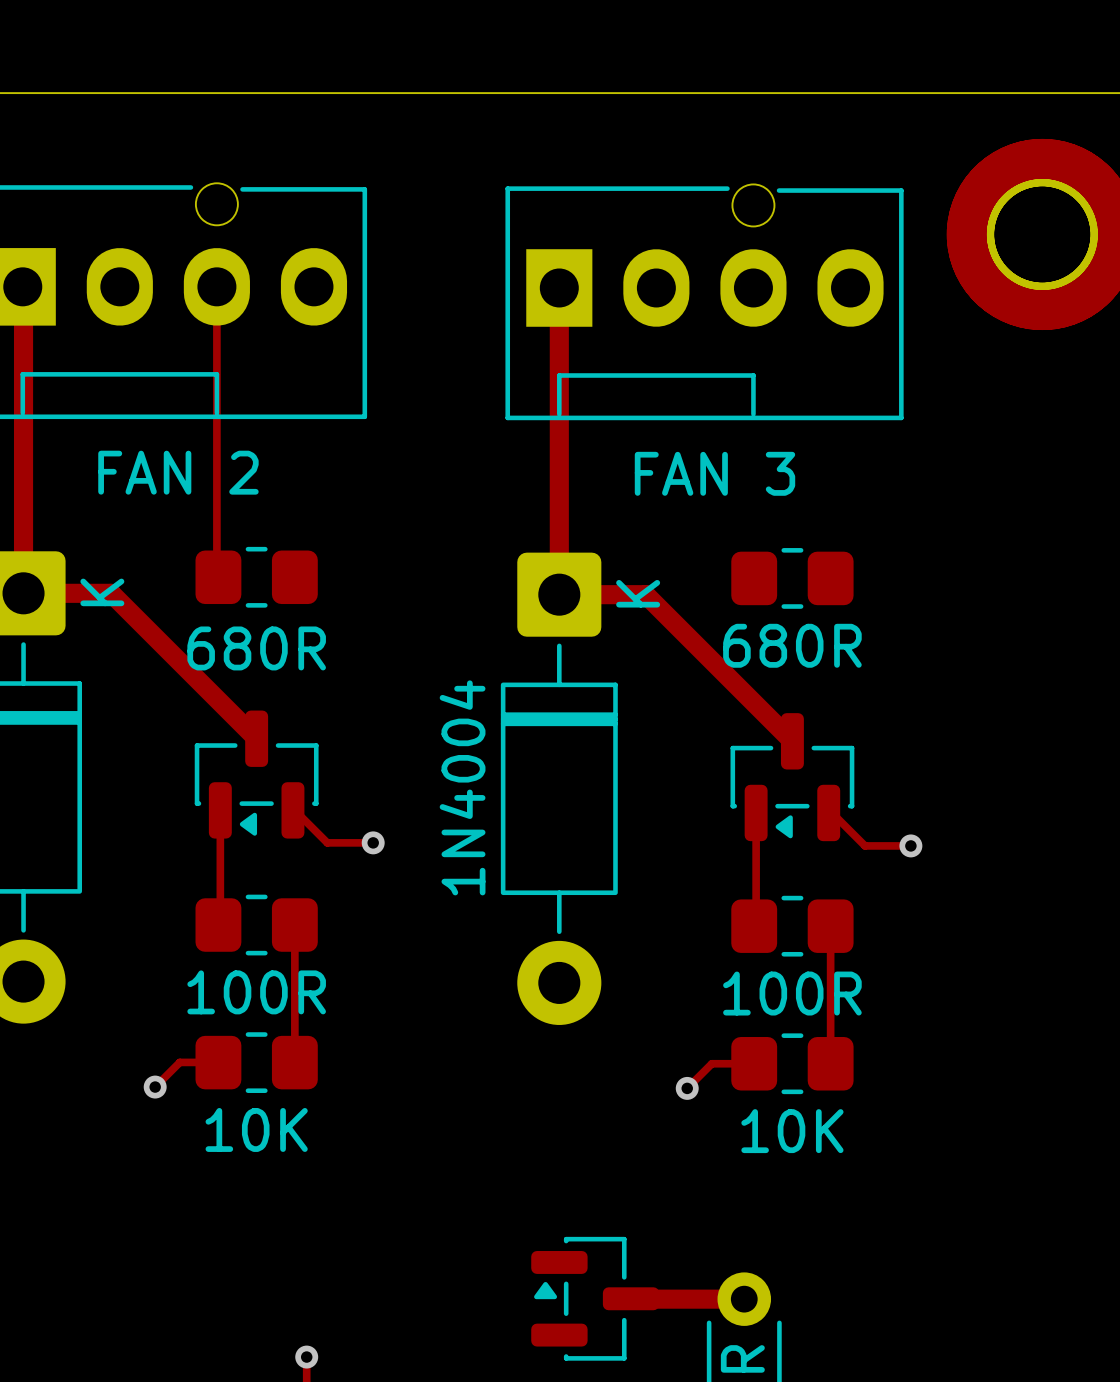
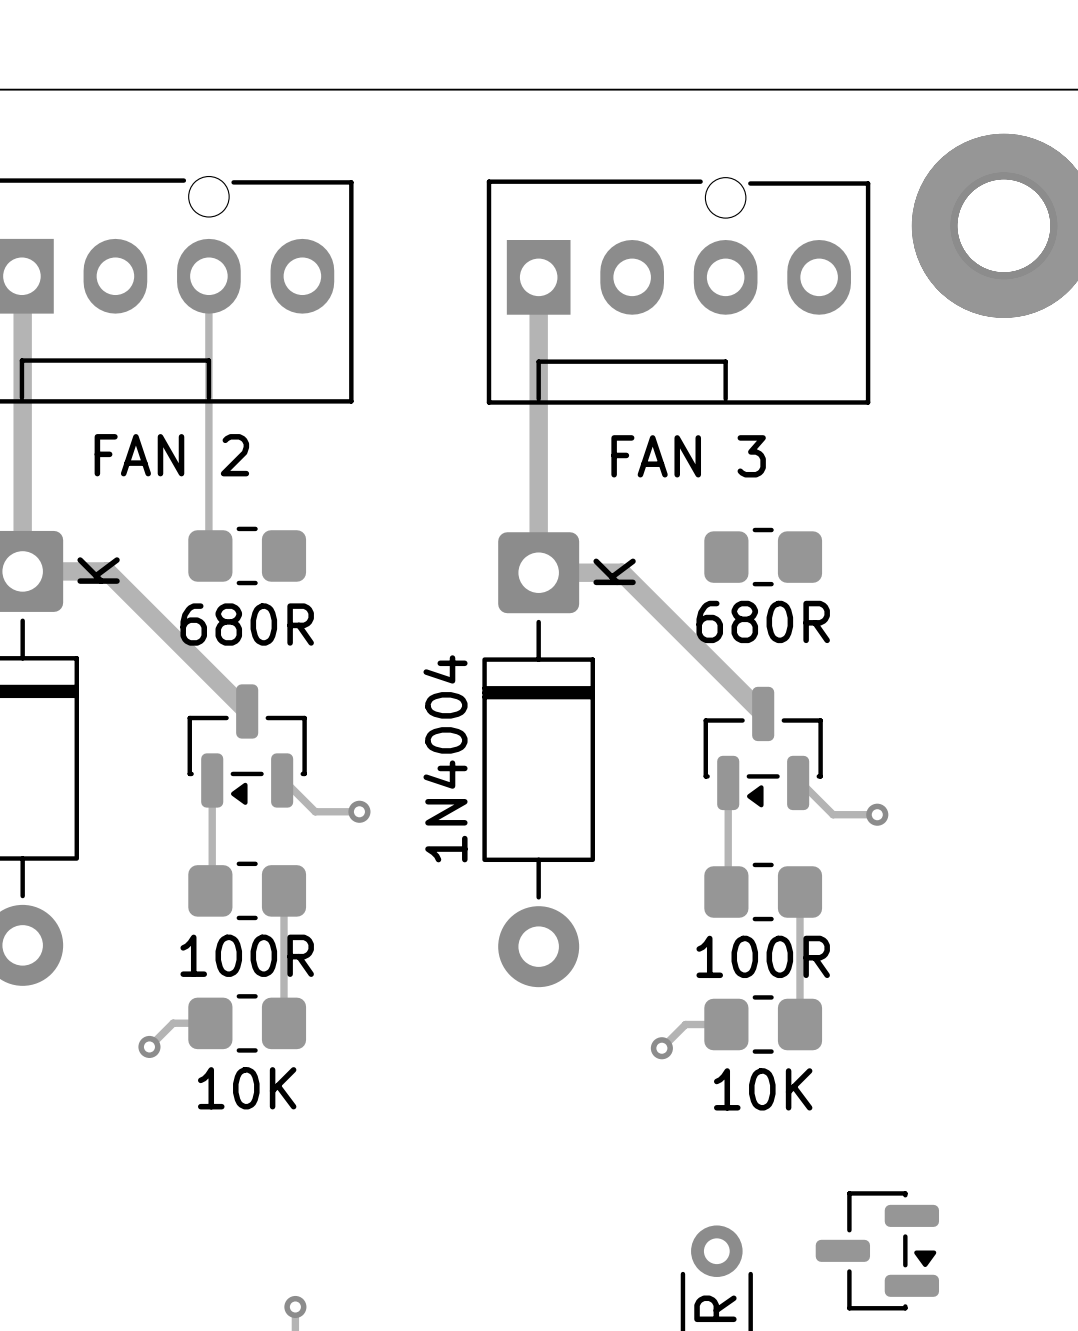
part rotation: 0° (595, 1298) -> 180° (877, 1250)
part position: (595, 1298) -> (877, 1250)
track: (631, 1299) (744, 1299) -> none

